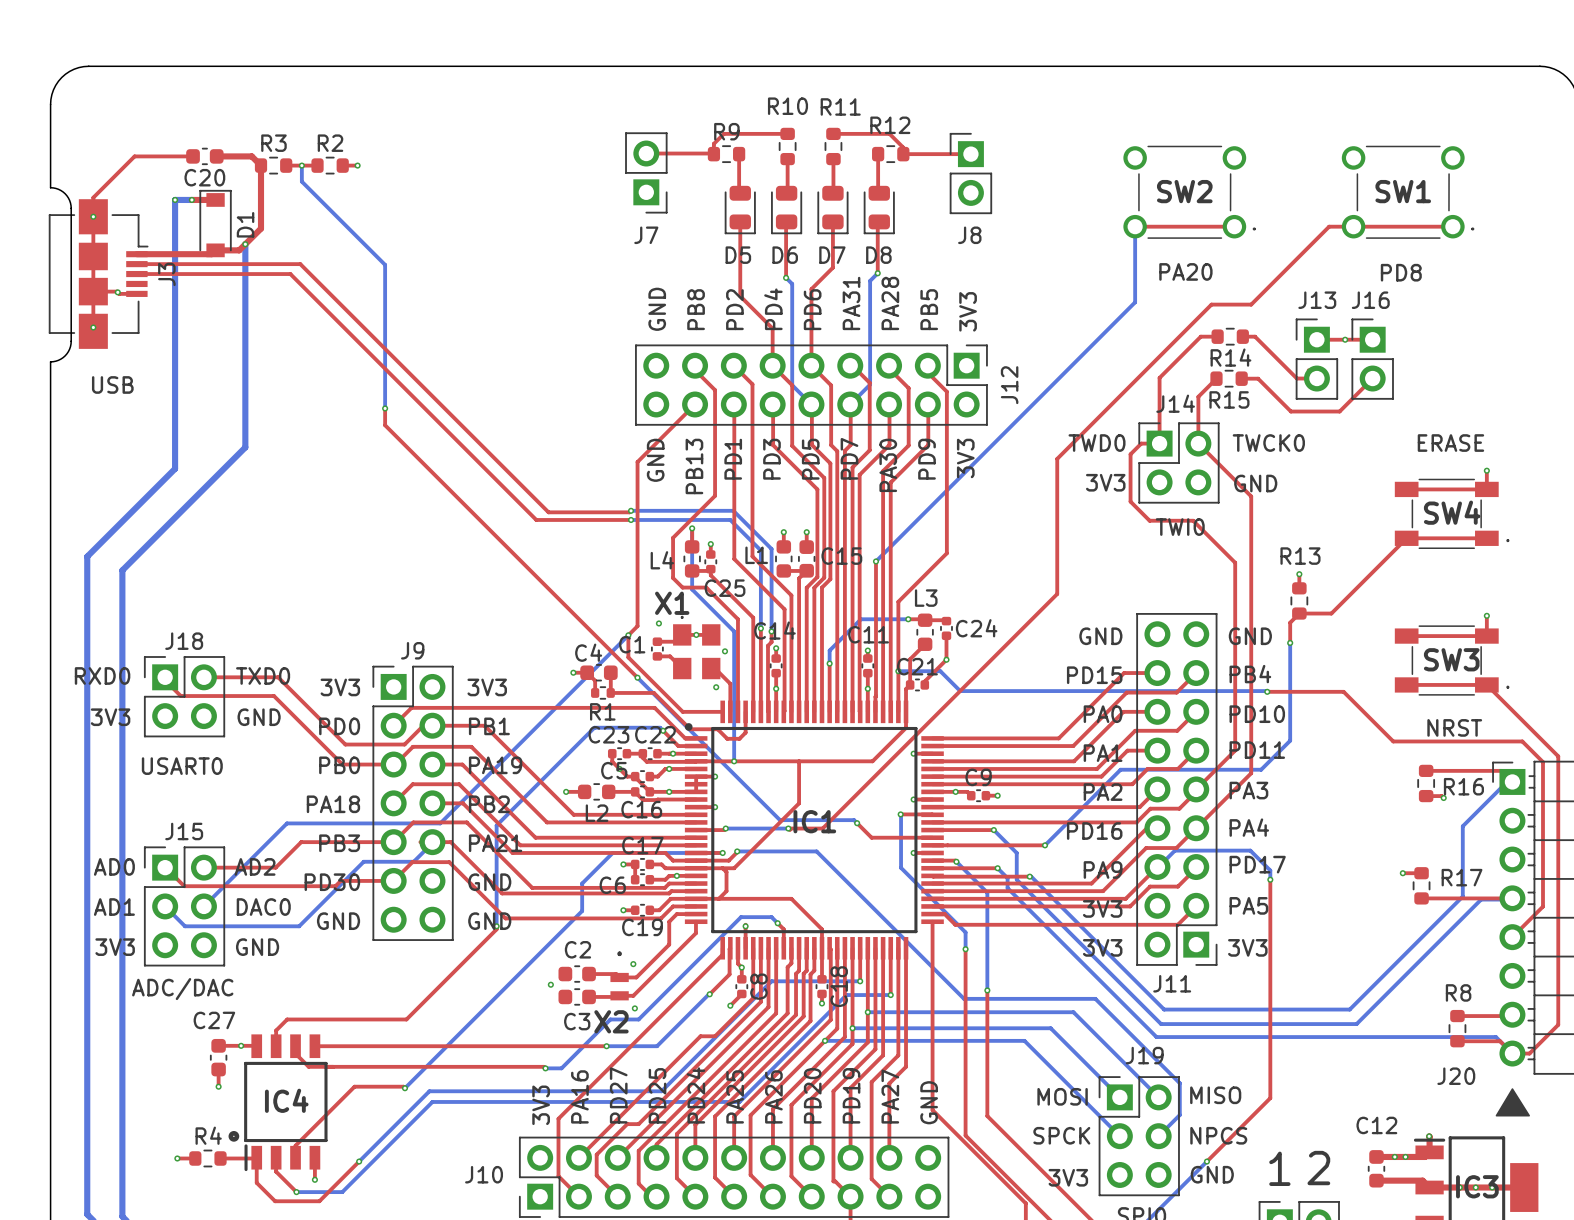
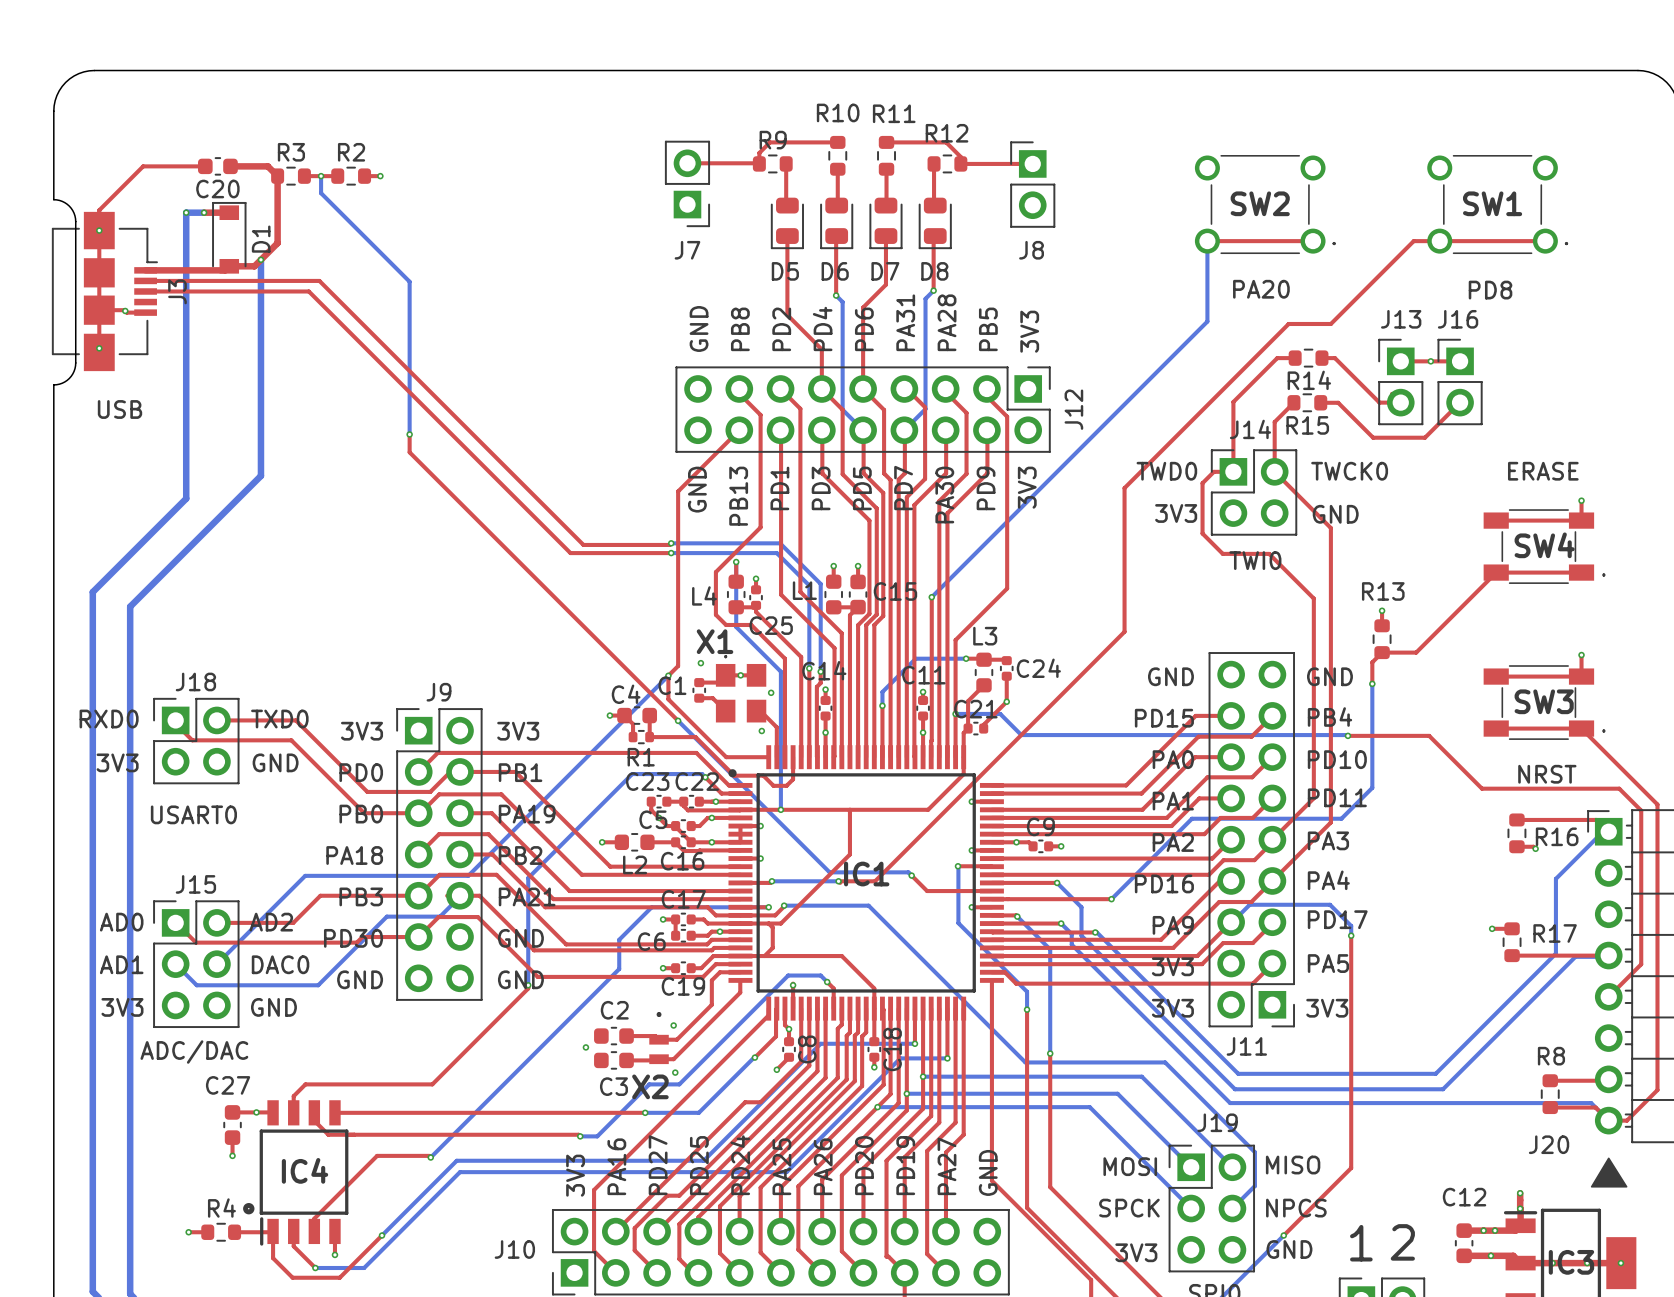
top track: none -> (1520, 1193) (1520, 1208)
via: none -> (1520, 1193)
via: none -> (1490, 1255)
via: (1475, 1187) -> none
via: none -> (1620, 1263)

